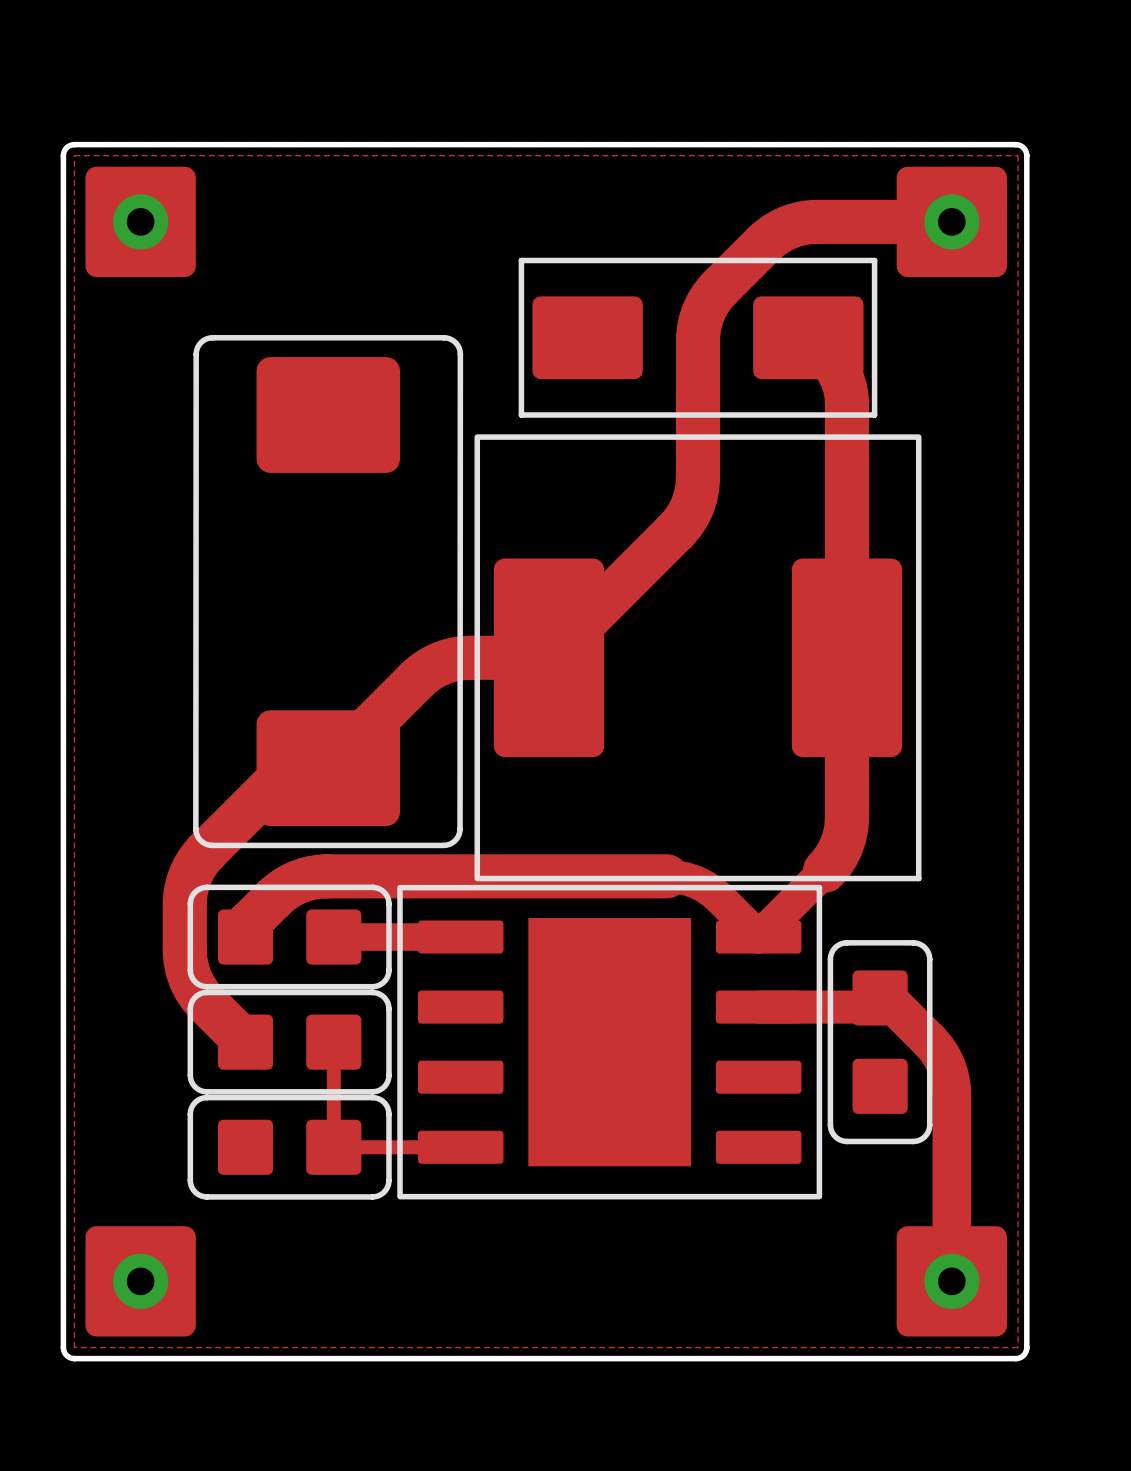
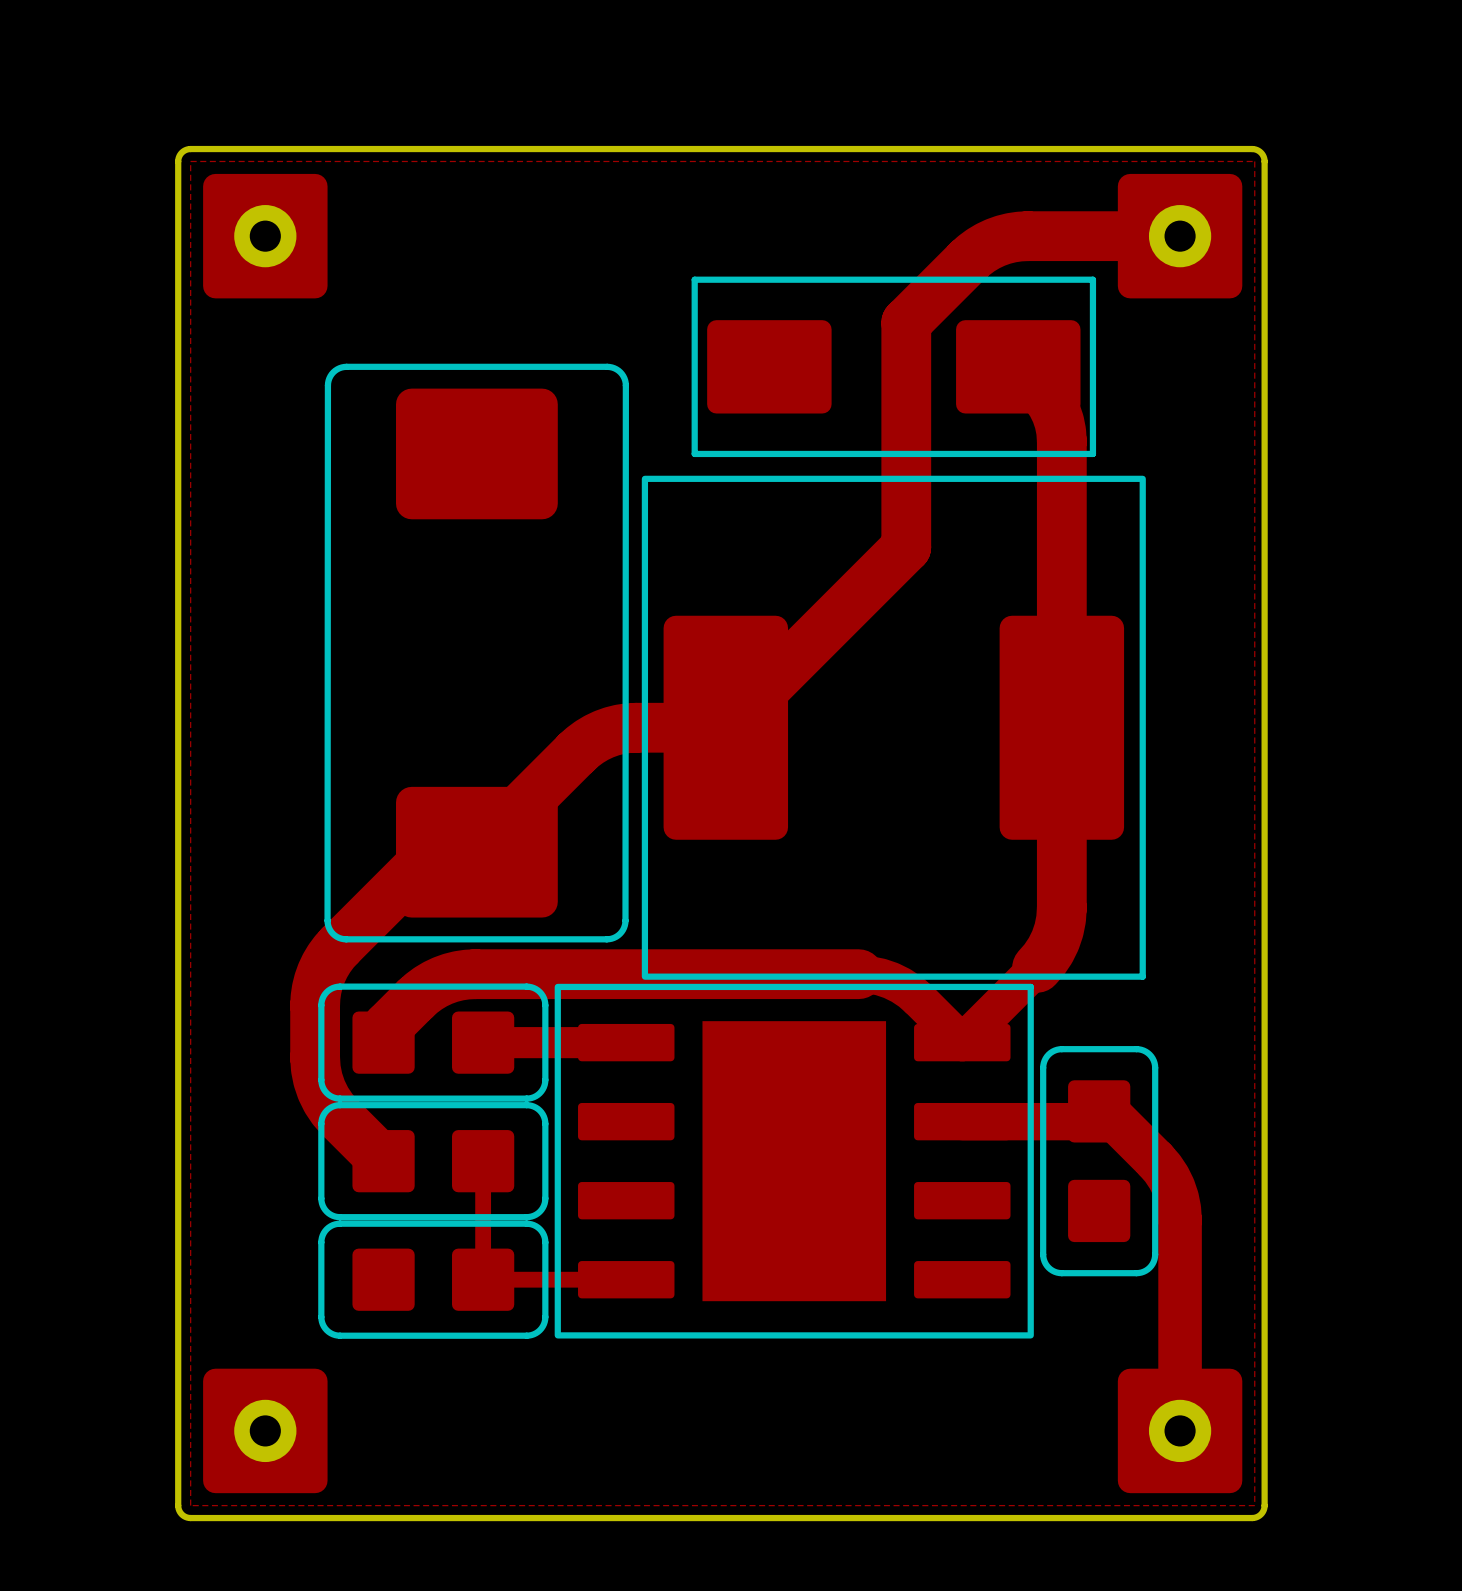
track: (719, 287) (706, 305) (699, 326) (697, 487) (687, 515) (676, 530) -> (918, 310) (906, 322) (906, 547) (869, 584)

